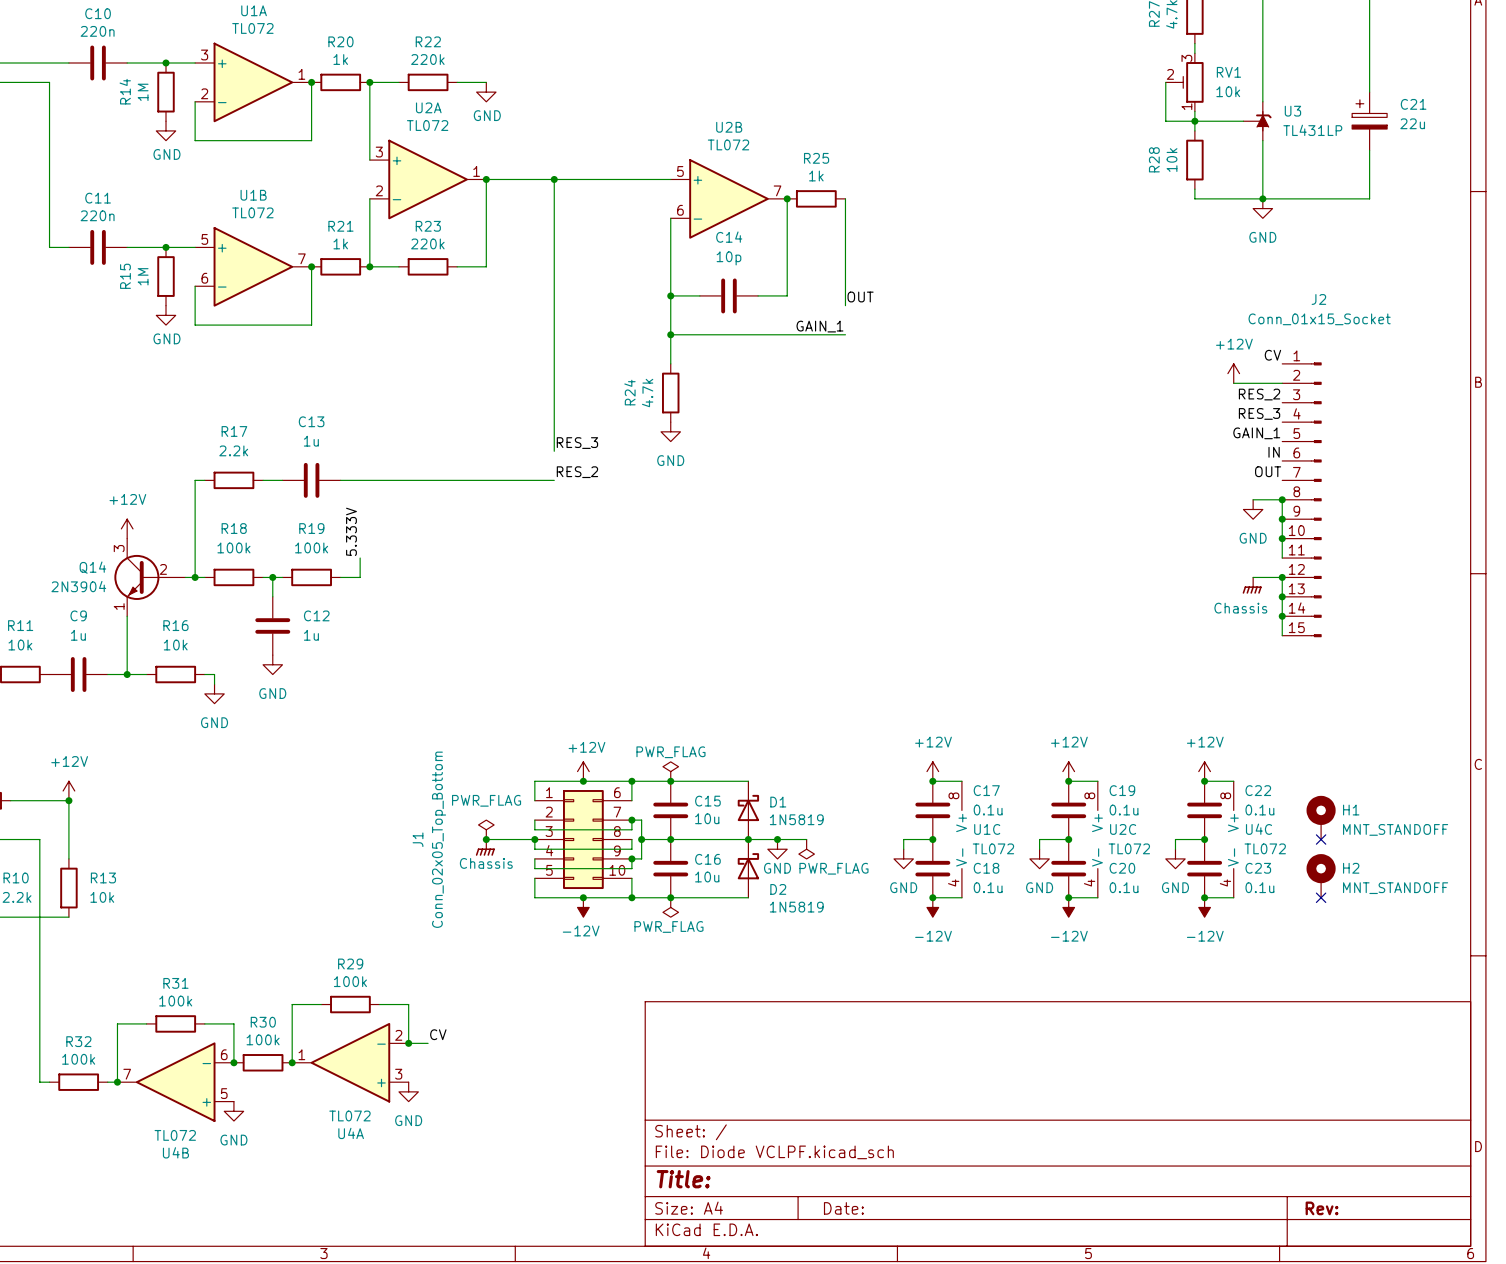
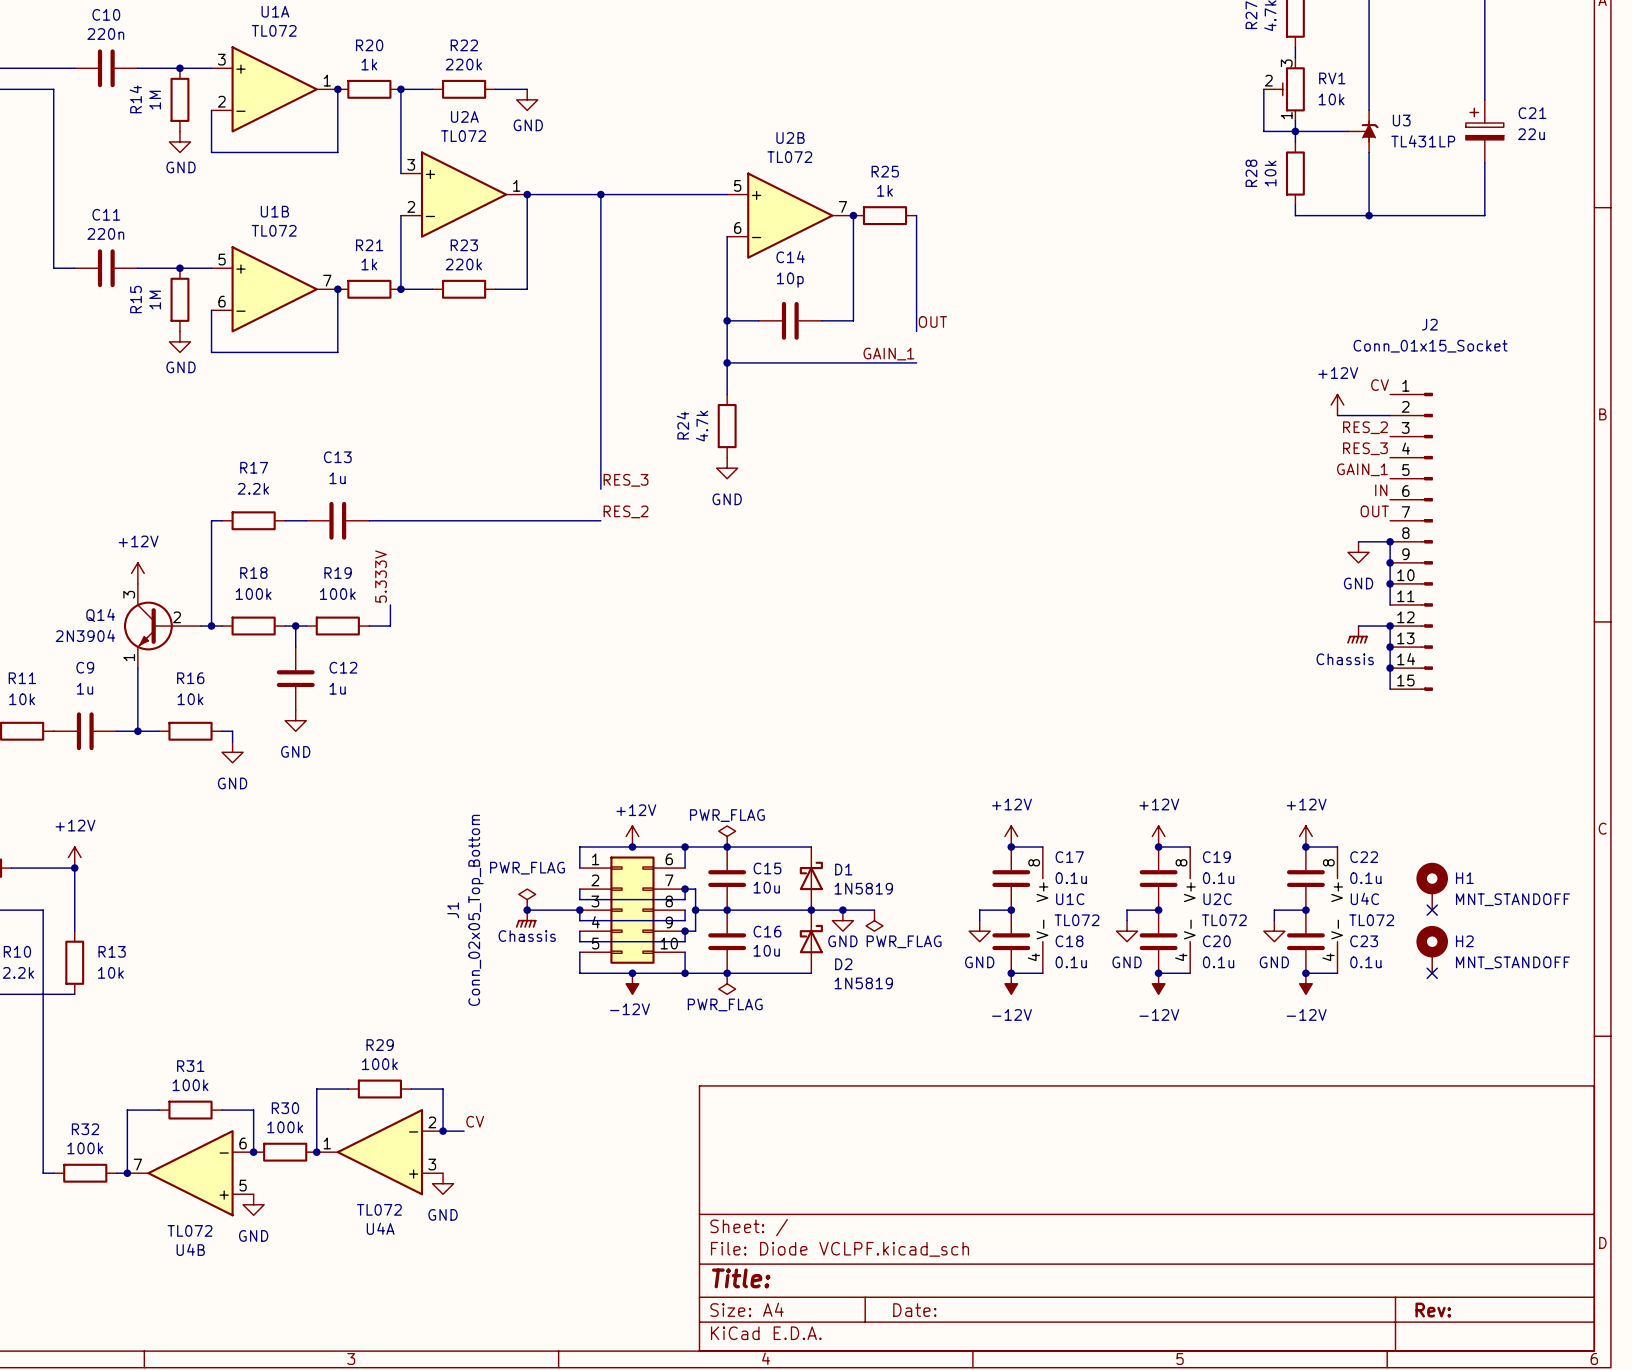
power symbol: GND (1262, 208) -> none

